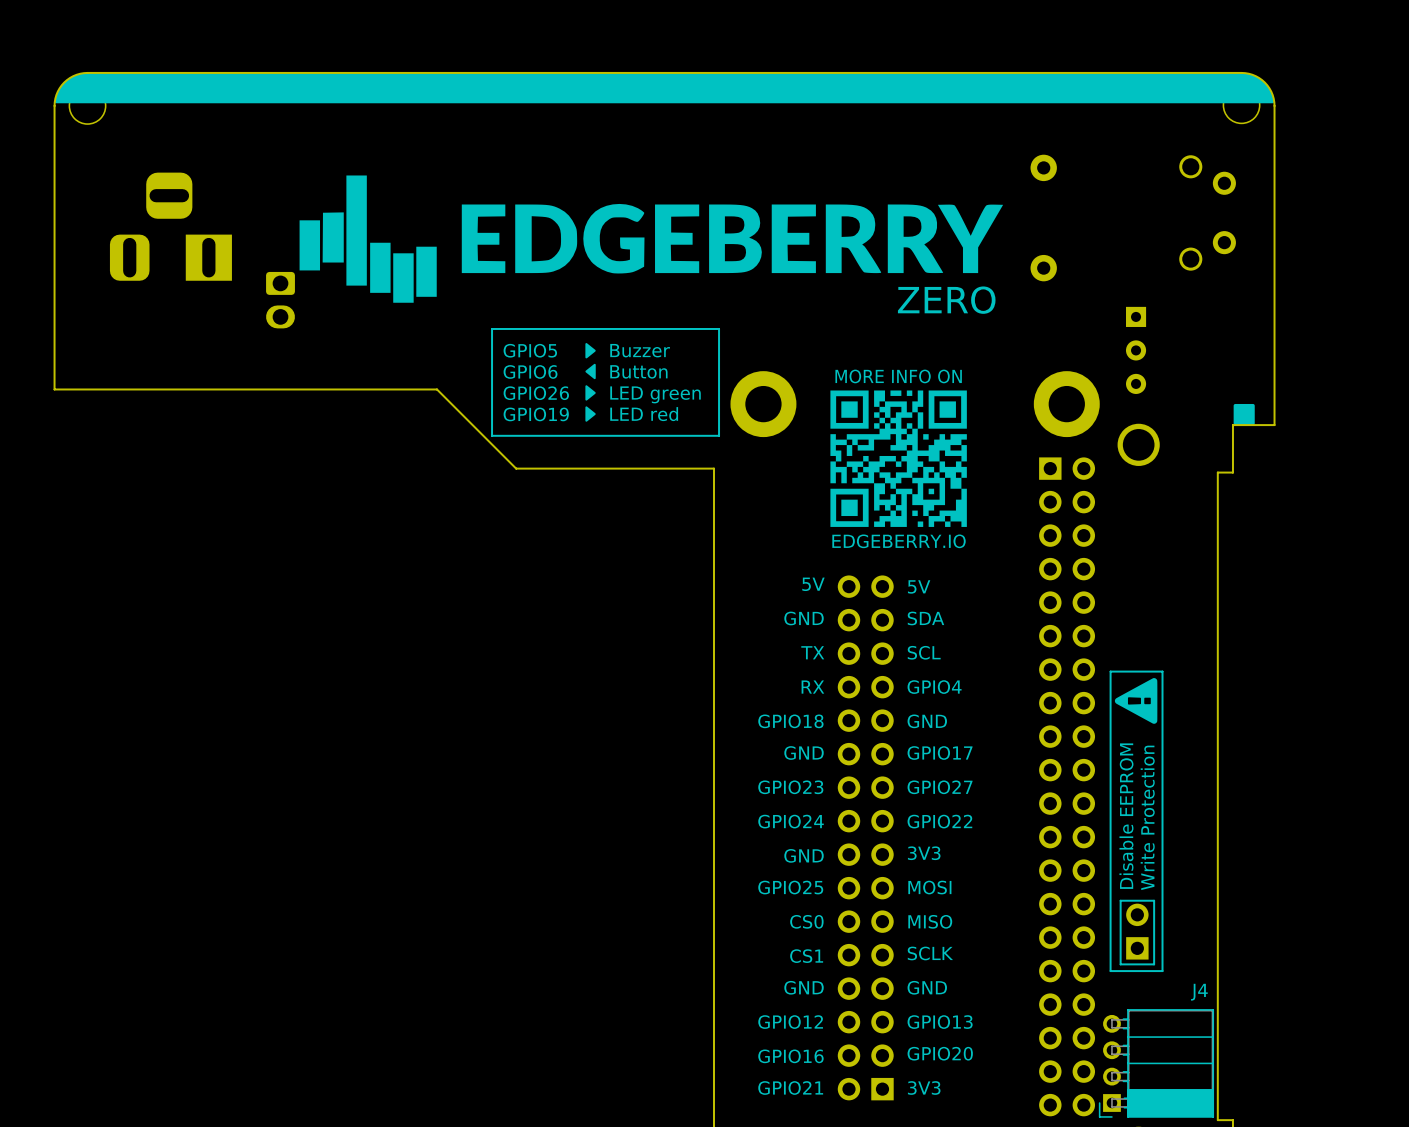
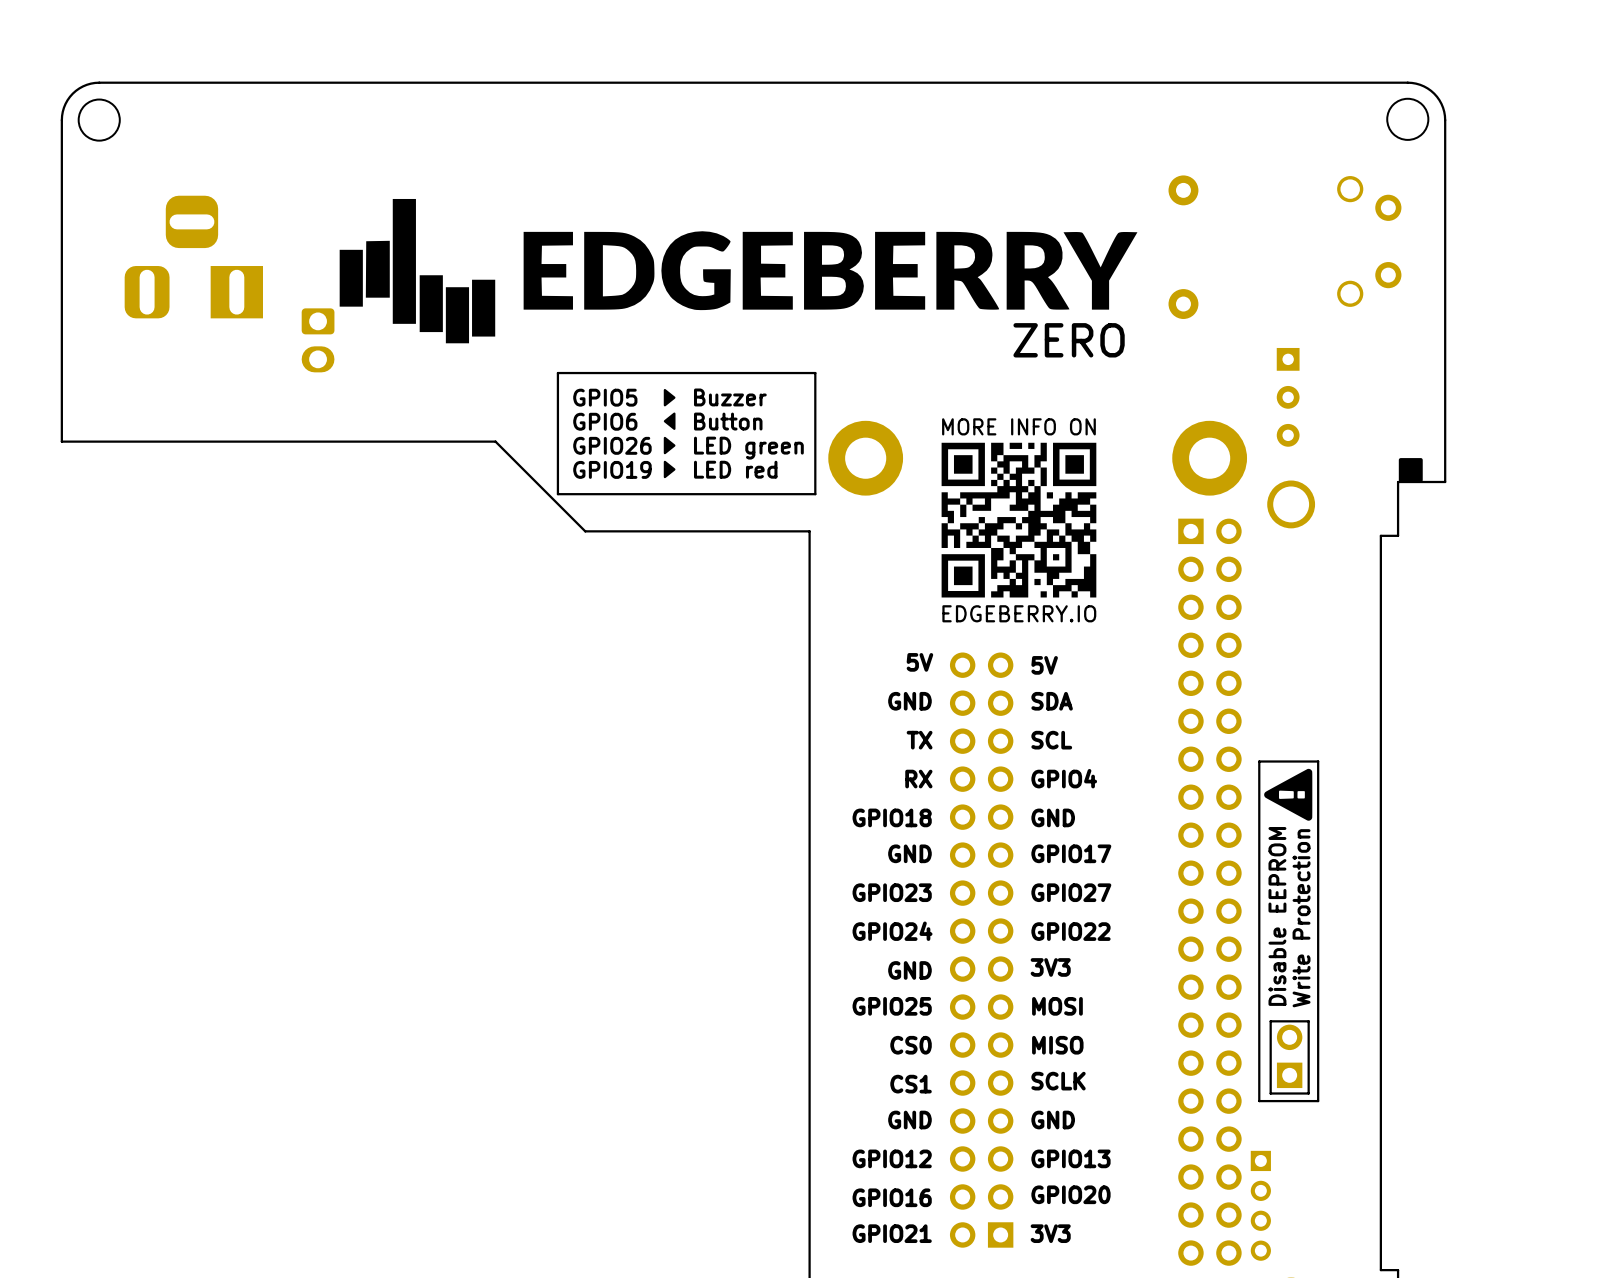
drawing: [54, 72, 1275, 104] -> none
J4 side: bottom (1156, 1063) -> top (1260, 1205)

